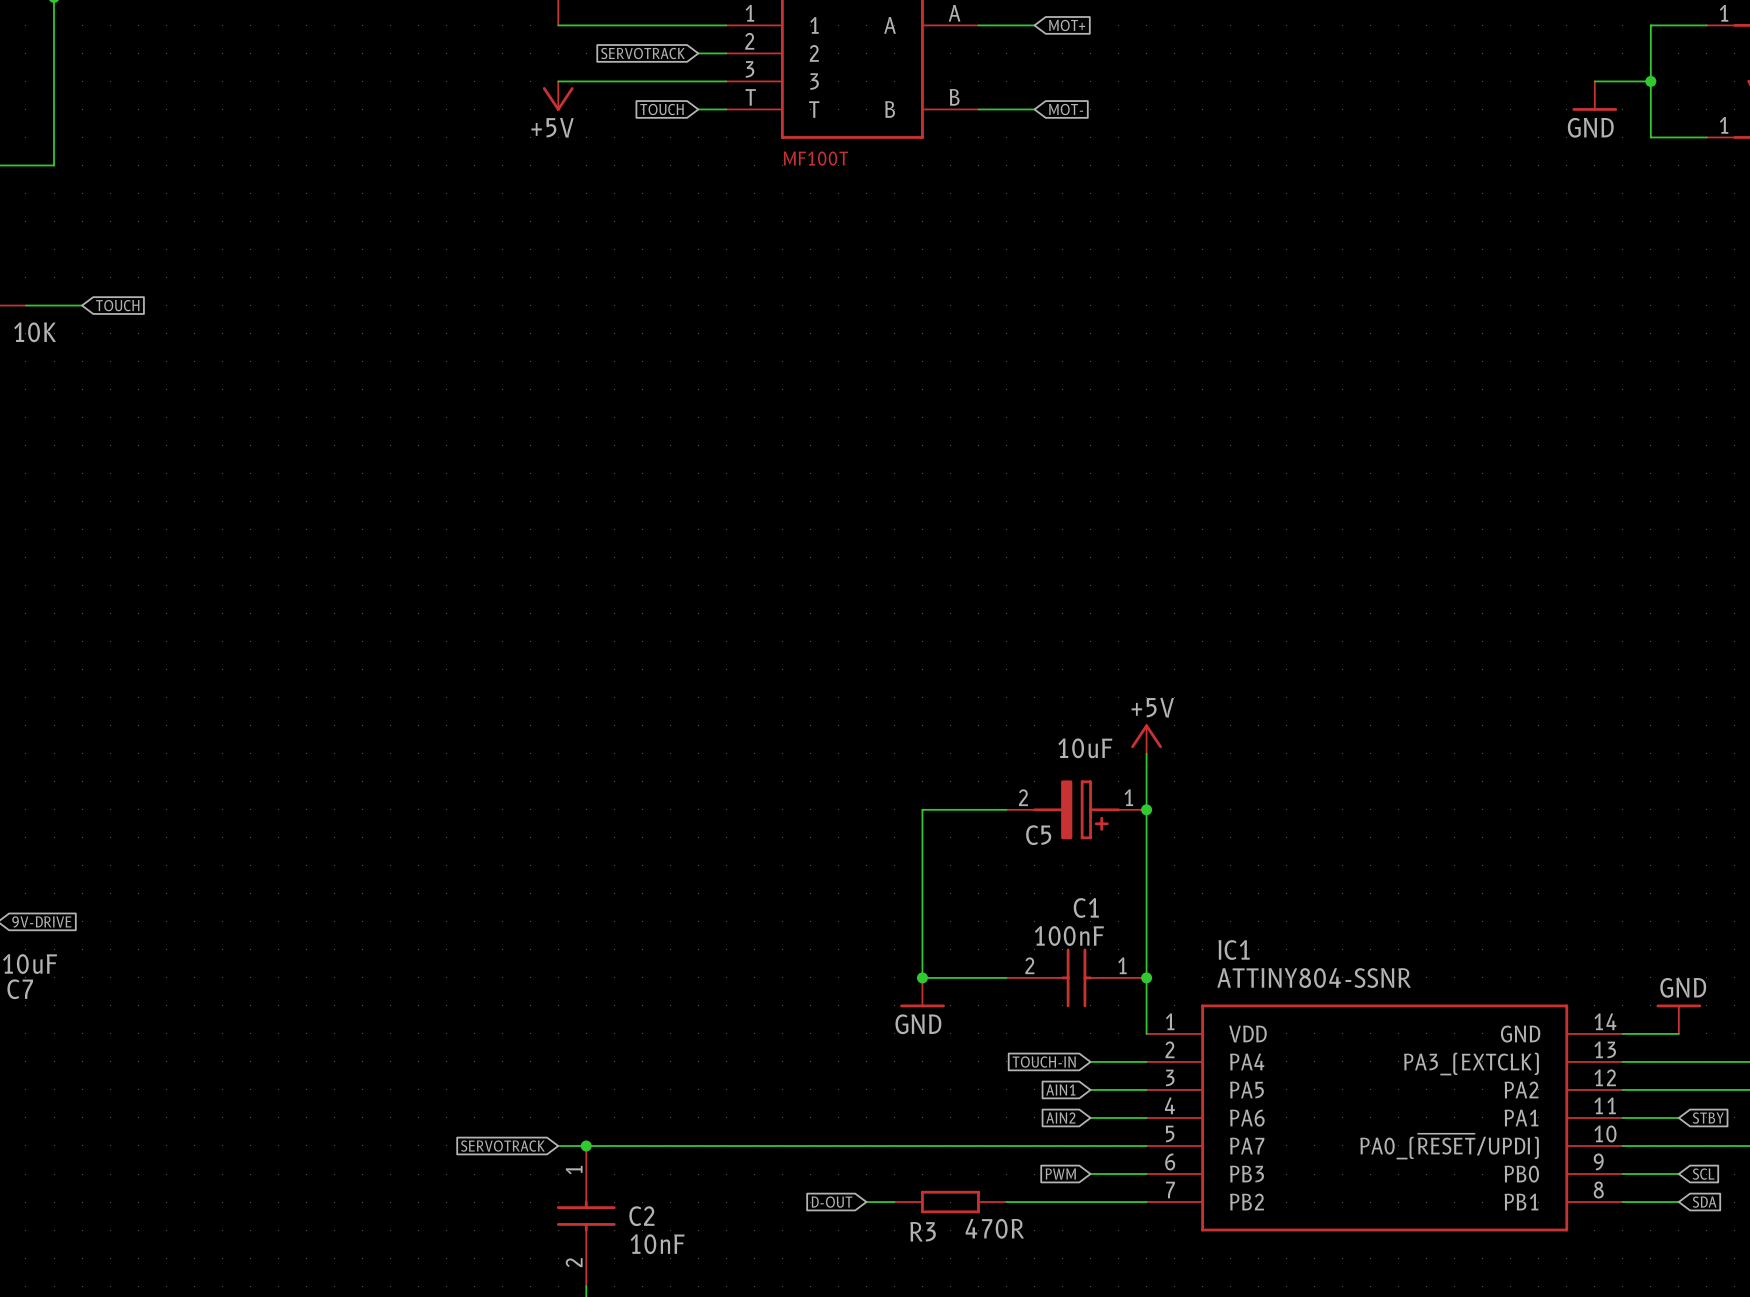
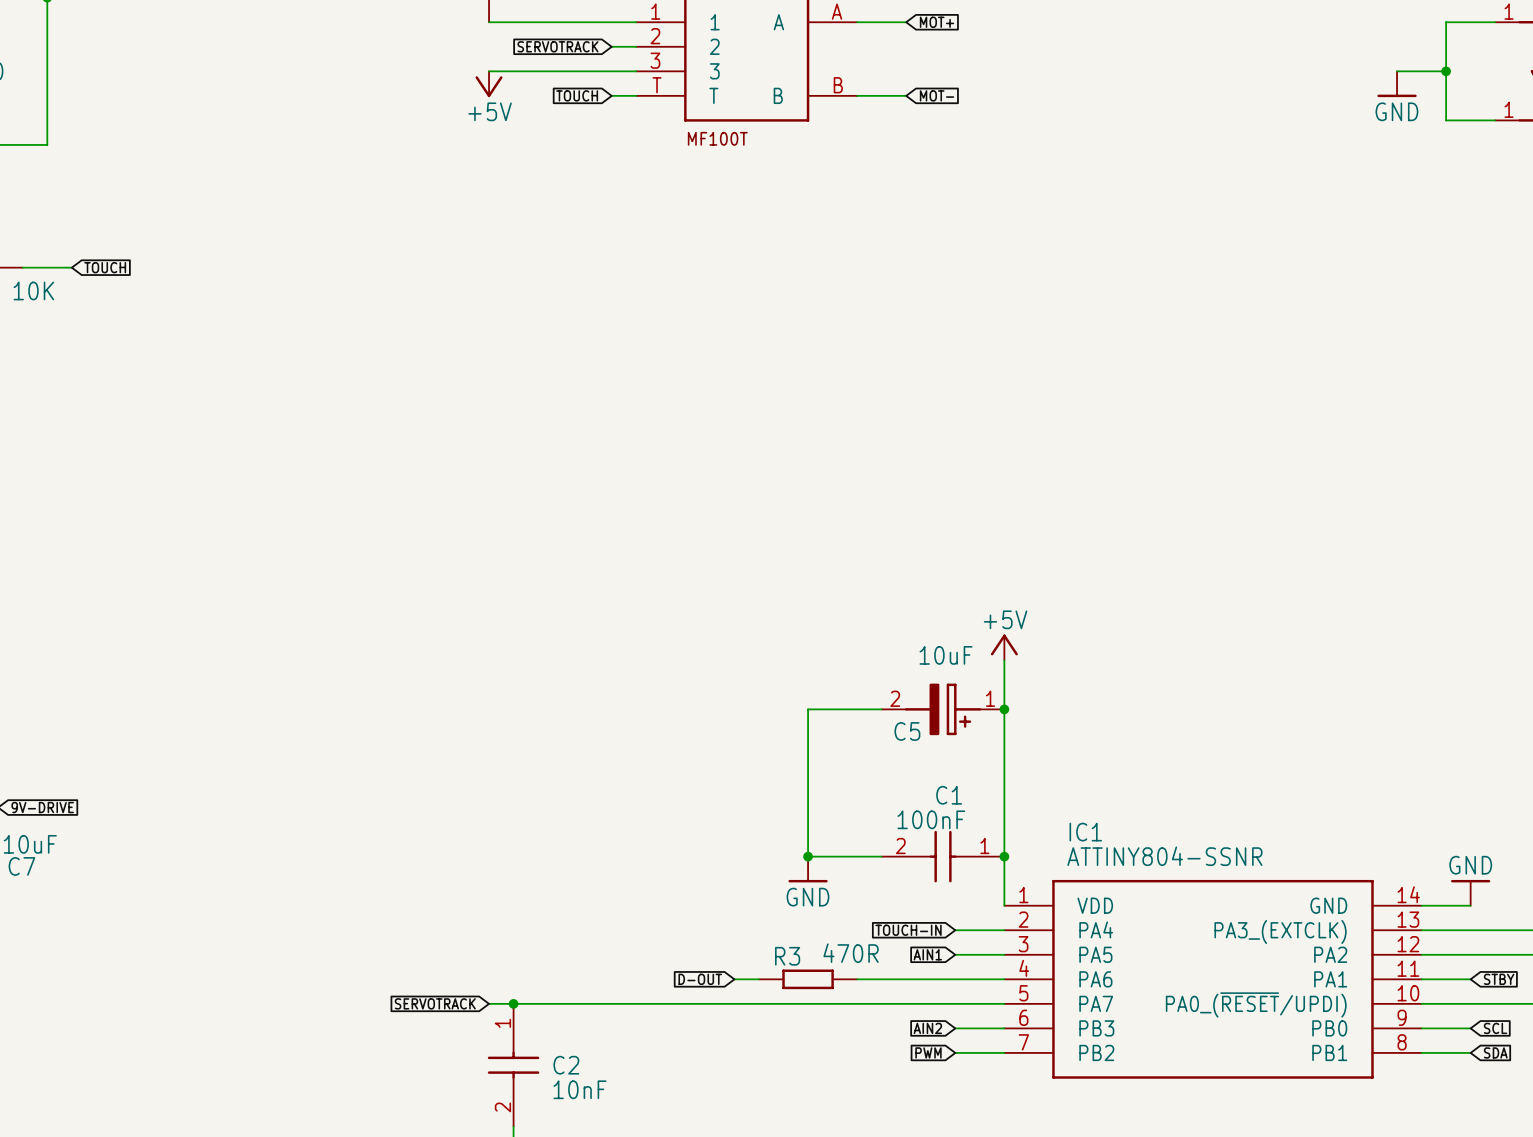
wire: none -> (857, 979) (955, 979)
global label: AIN2 (1060, 1117) -> none
global label: PWM (1060, 1174) -> AIN2 (927, 1028)
global label position: D-OUT (832, 1202) -> D-OUT (700, 979)
wire: (866, 1202) (894, 1202) -> (734, 979) (758, 979)
R3 position: (950, 1202) -> (808, 979)
wire: (1006, 1202) (1090, 1202) -> none
global label: none -> PWM (928, 1052)
R3 value position: 470R (994, 1228) -> 470R (851, 953)
R3 name position: R3 (923, 1231) -> R3 (787, 956)

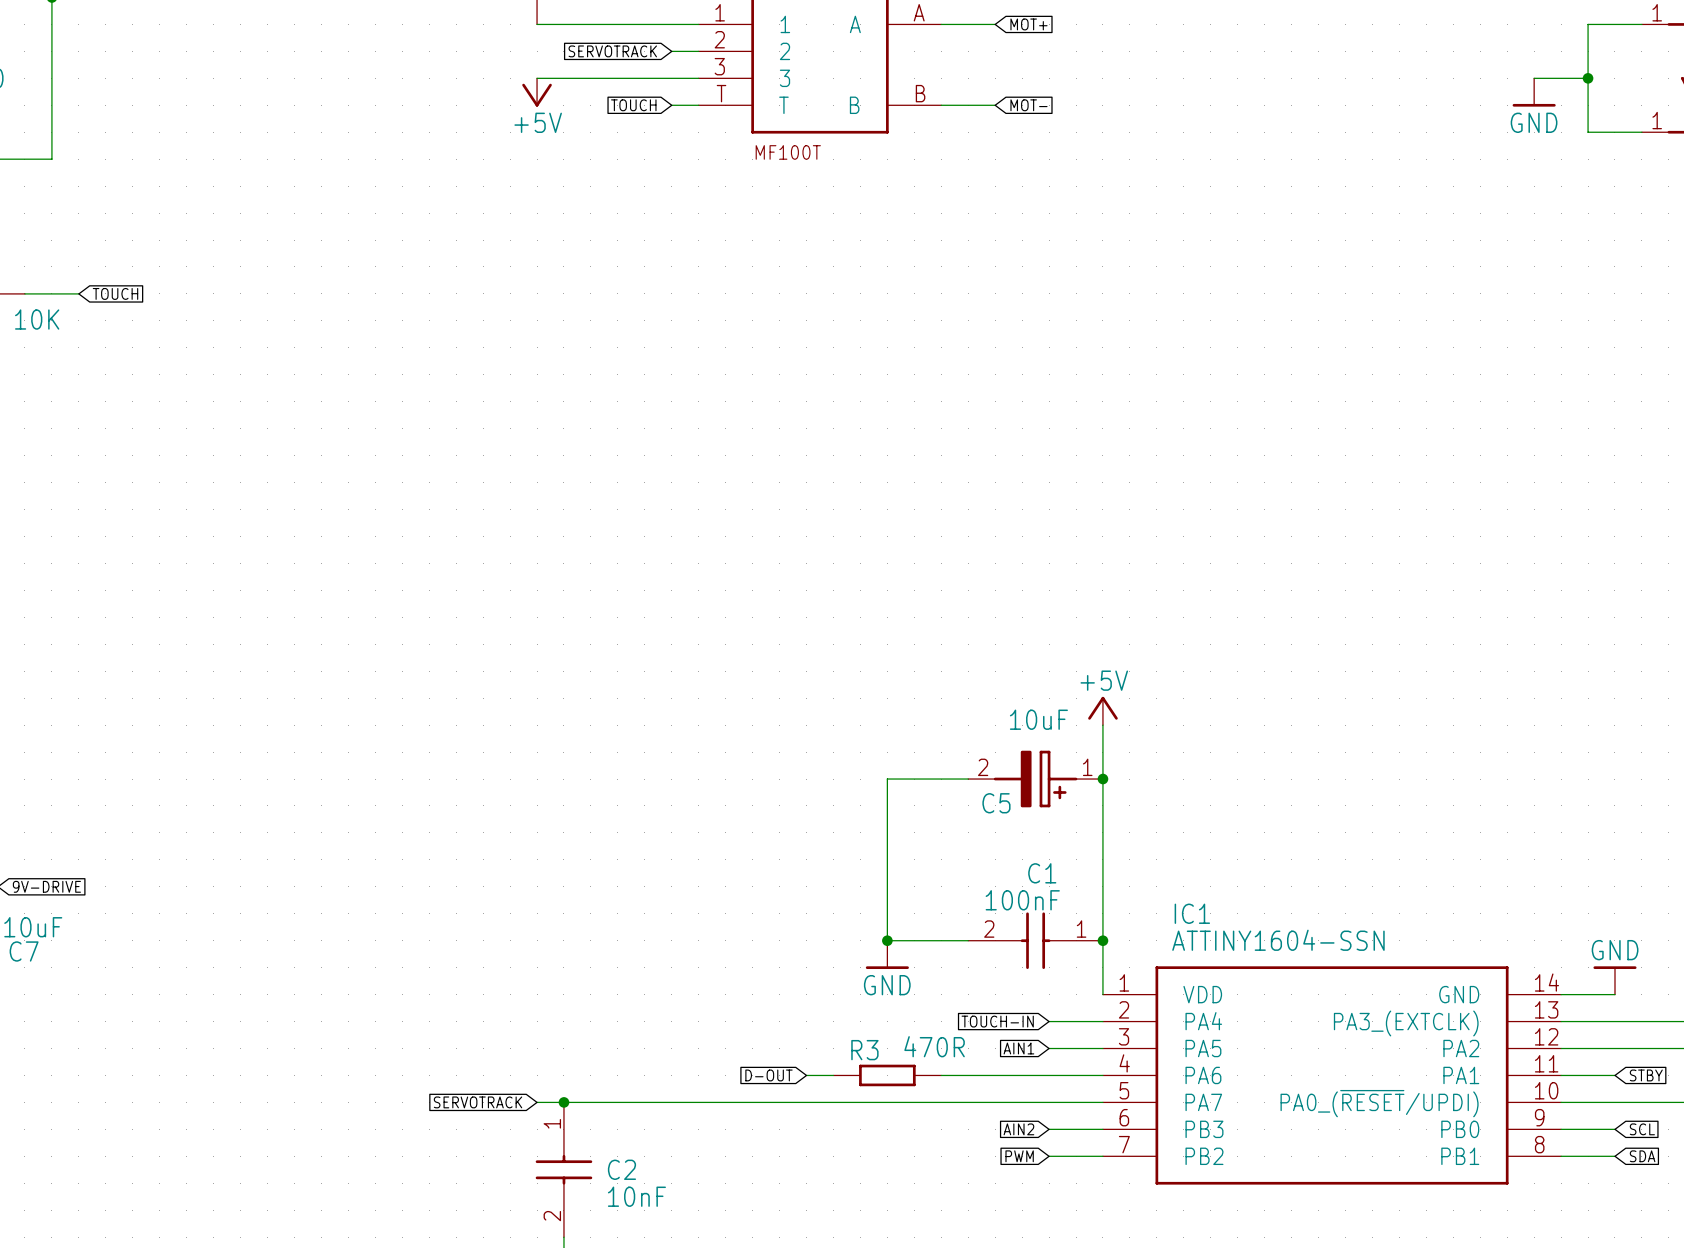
IC1 value: ATTINY804-SSNR (1164, 856) -> ATTINY1604-SSN (1278, 940)

